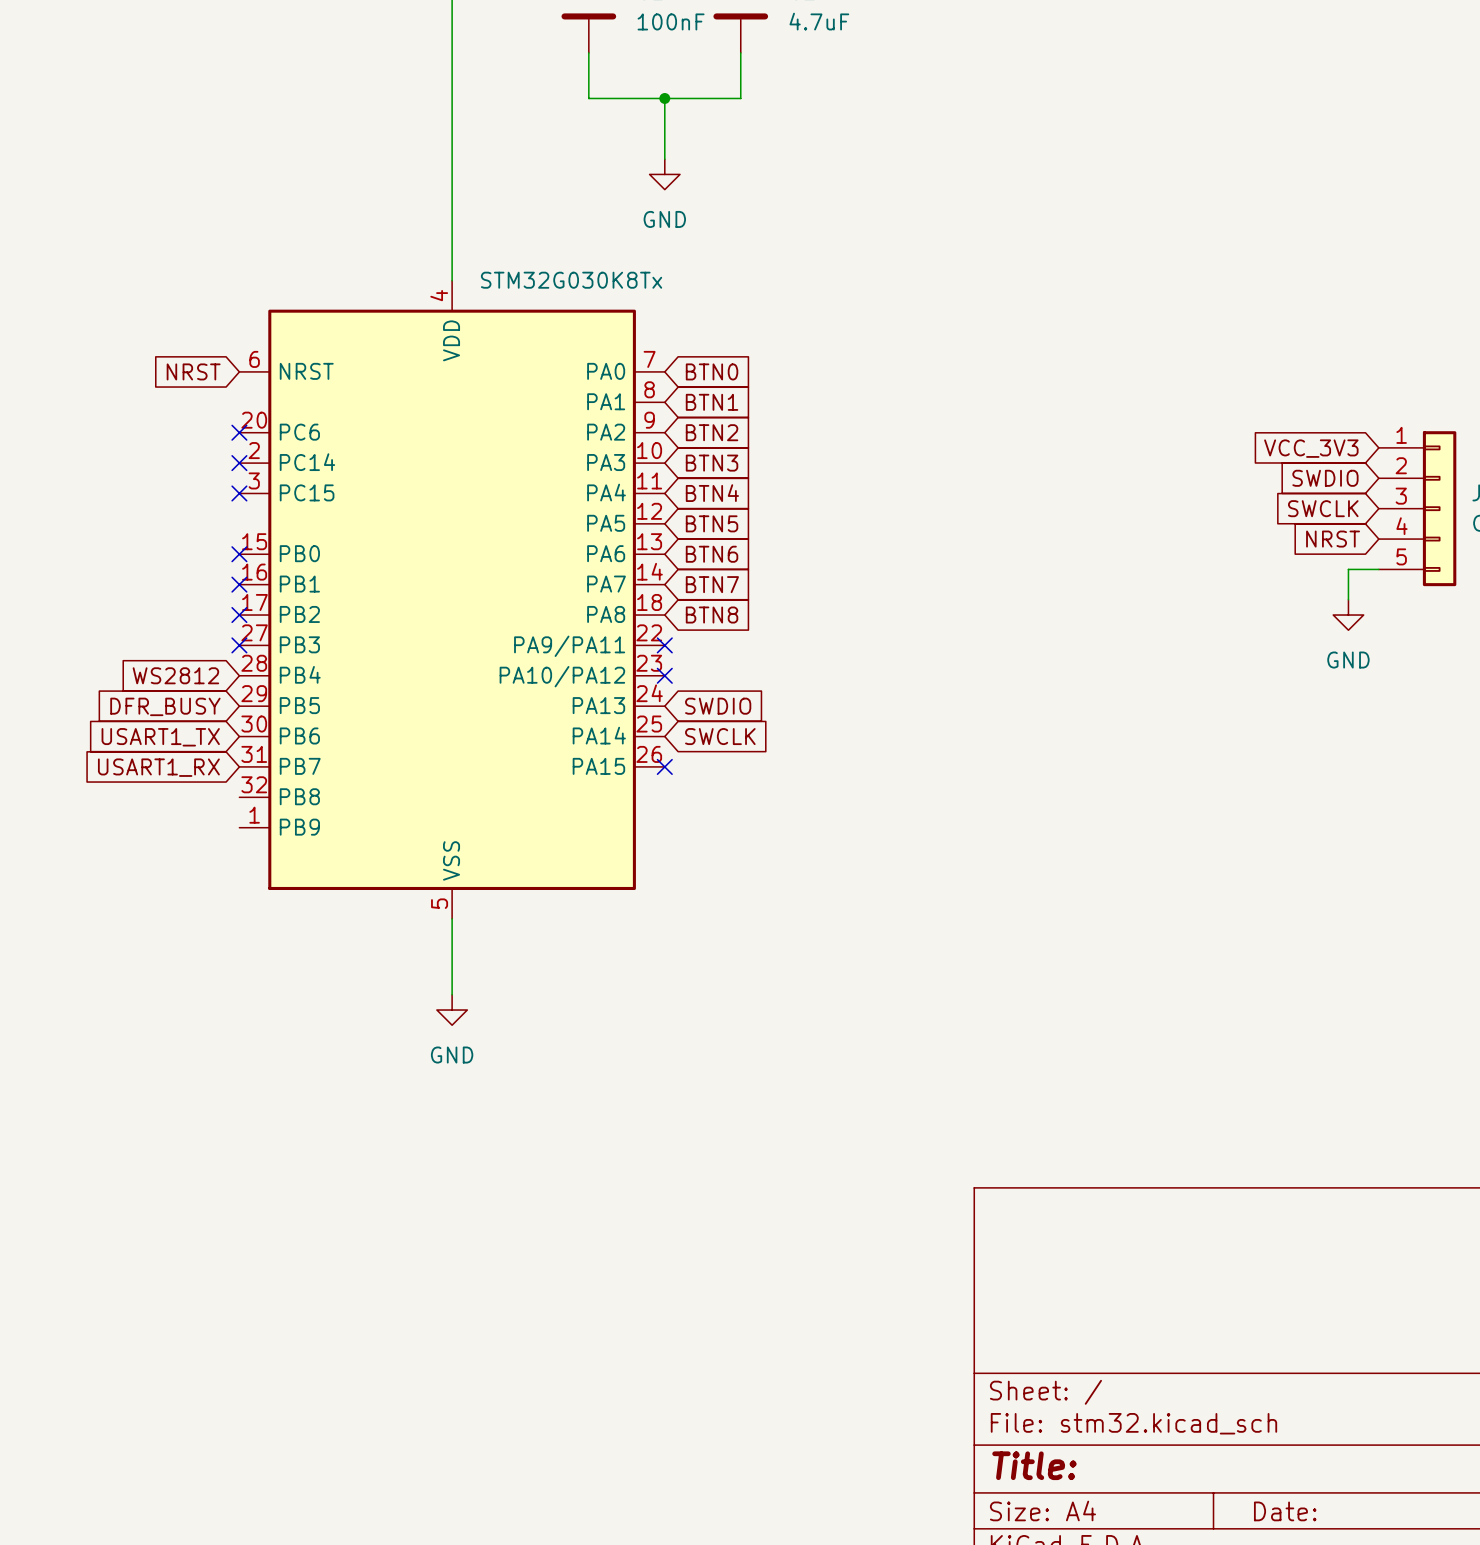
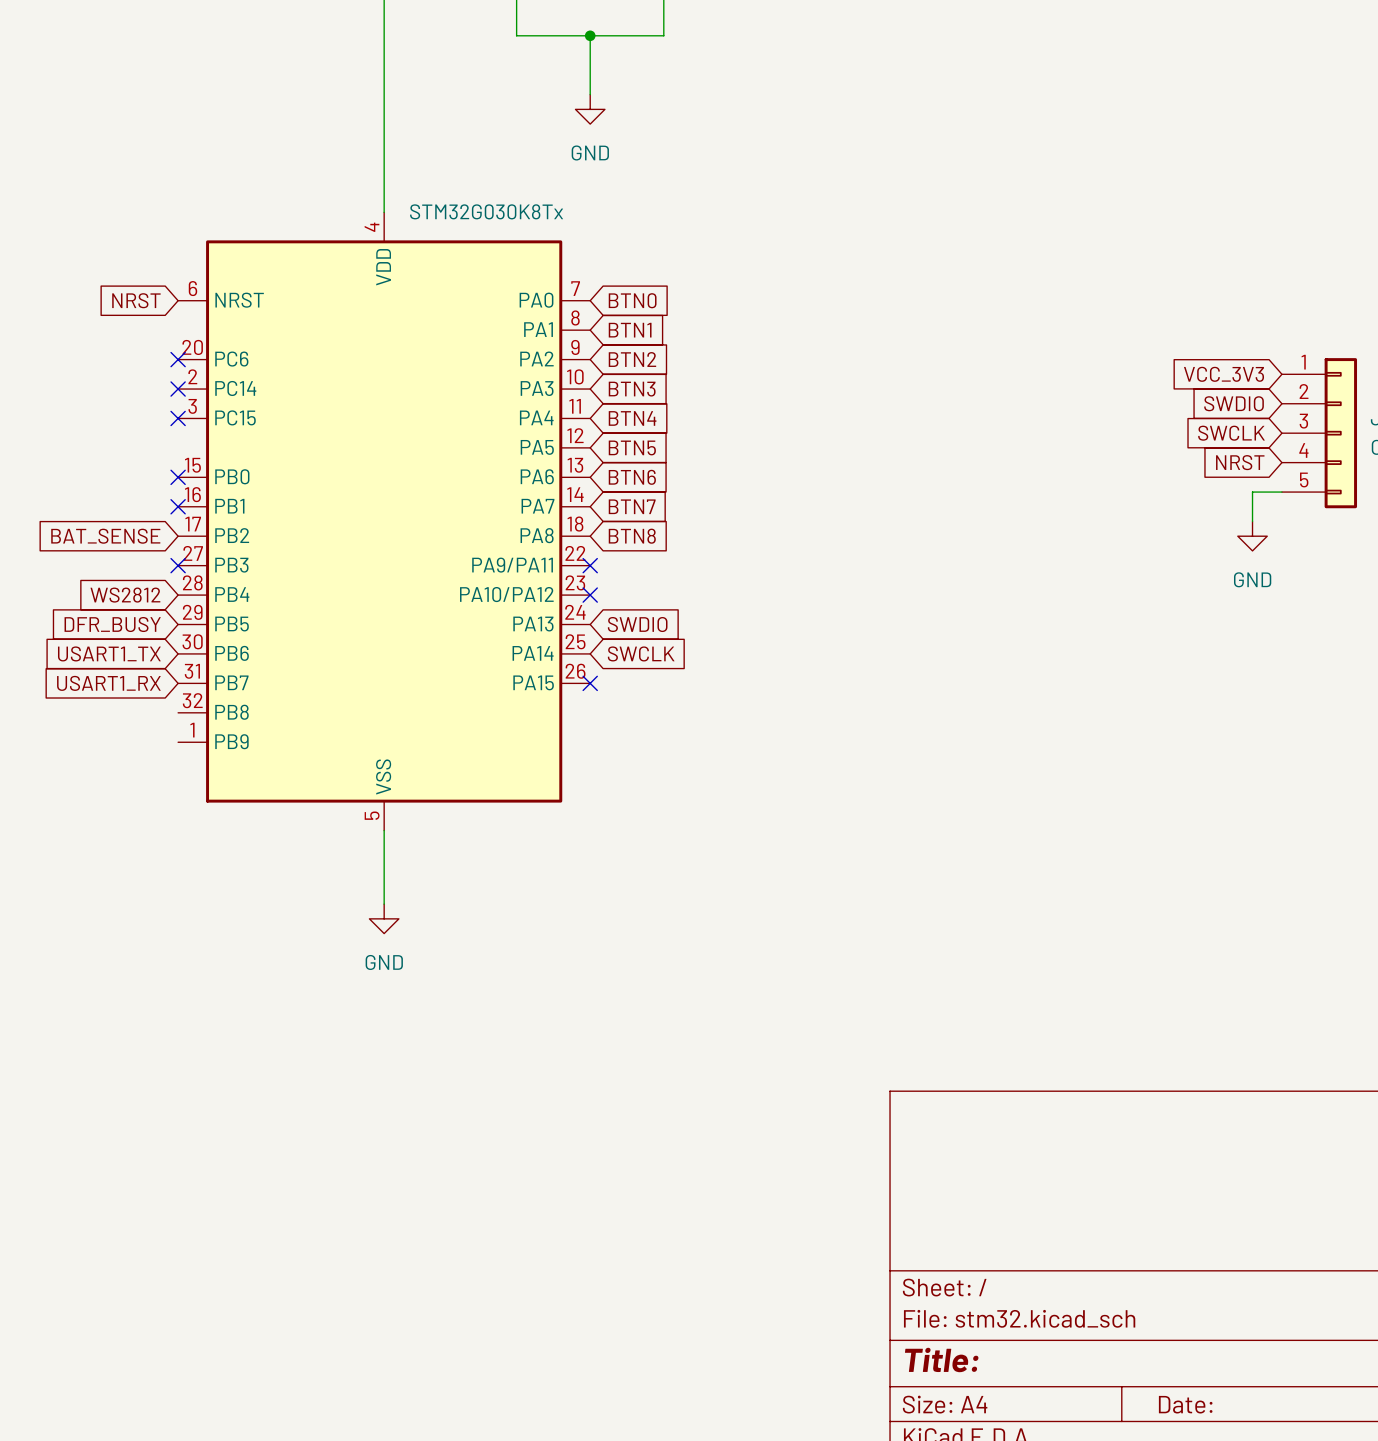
global label: none -> BAT_SENSE (105, 536)
no-connect mark: (239, 615) -> none

